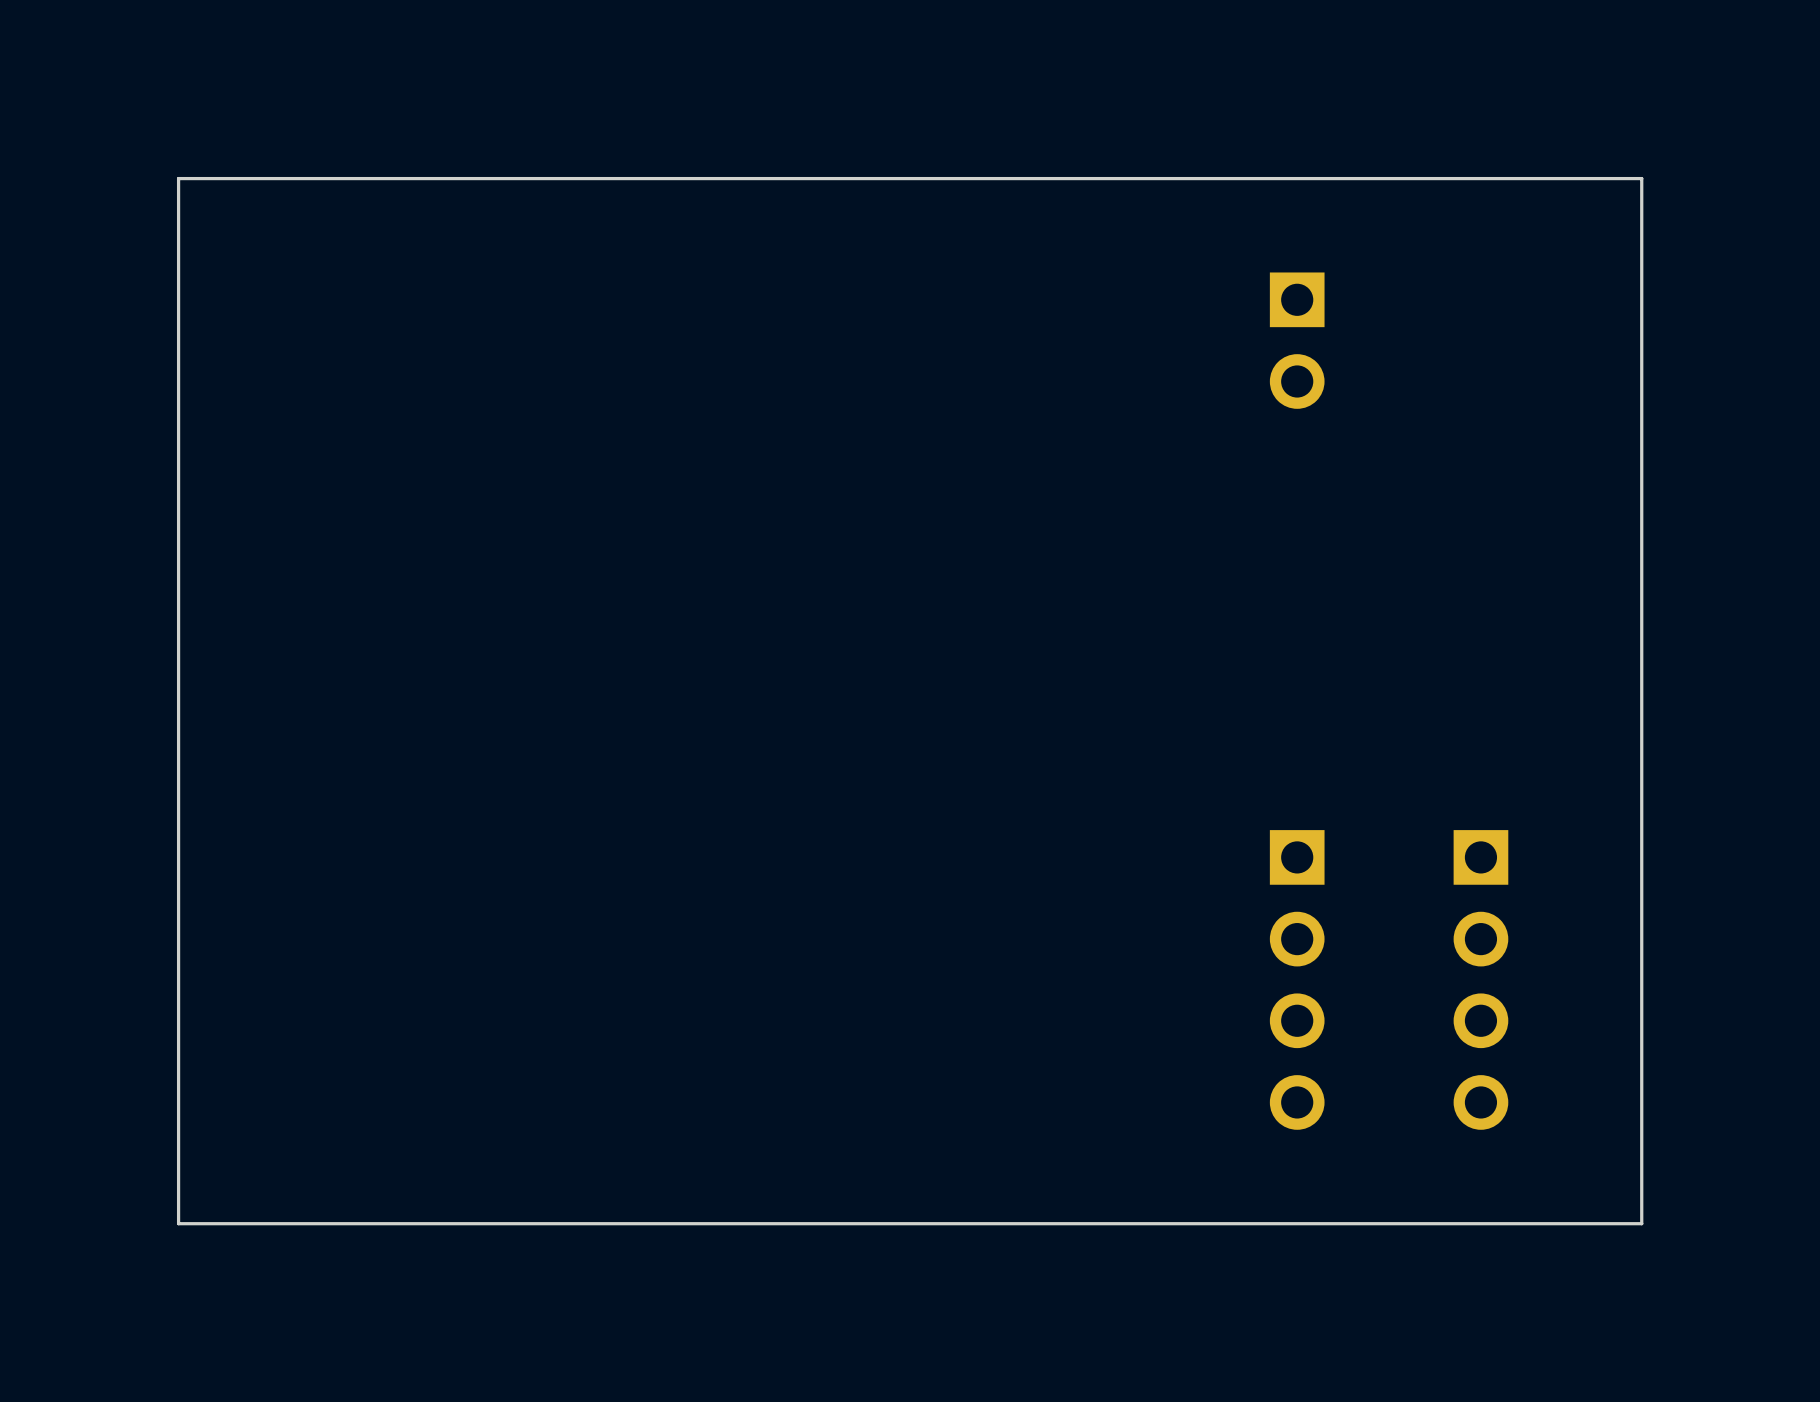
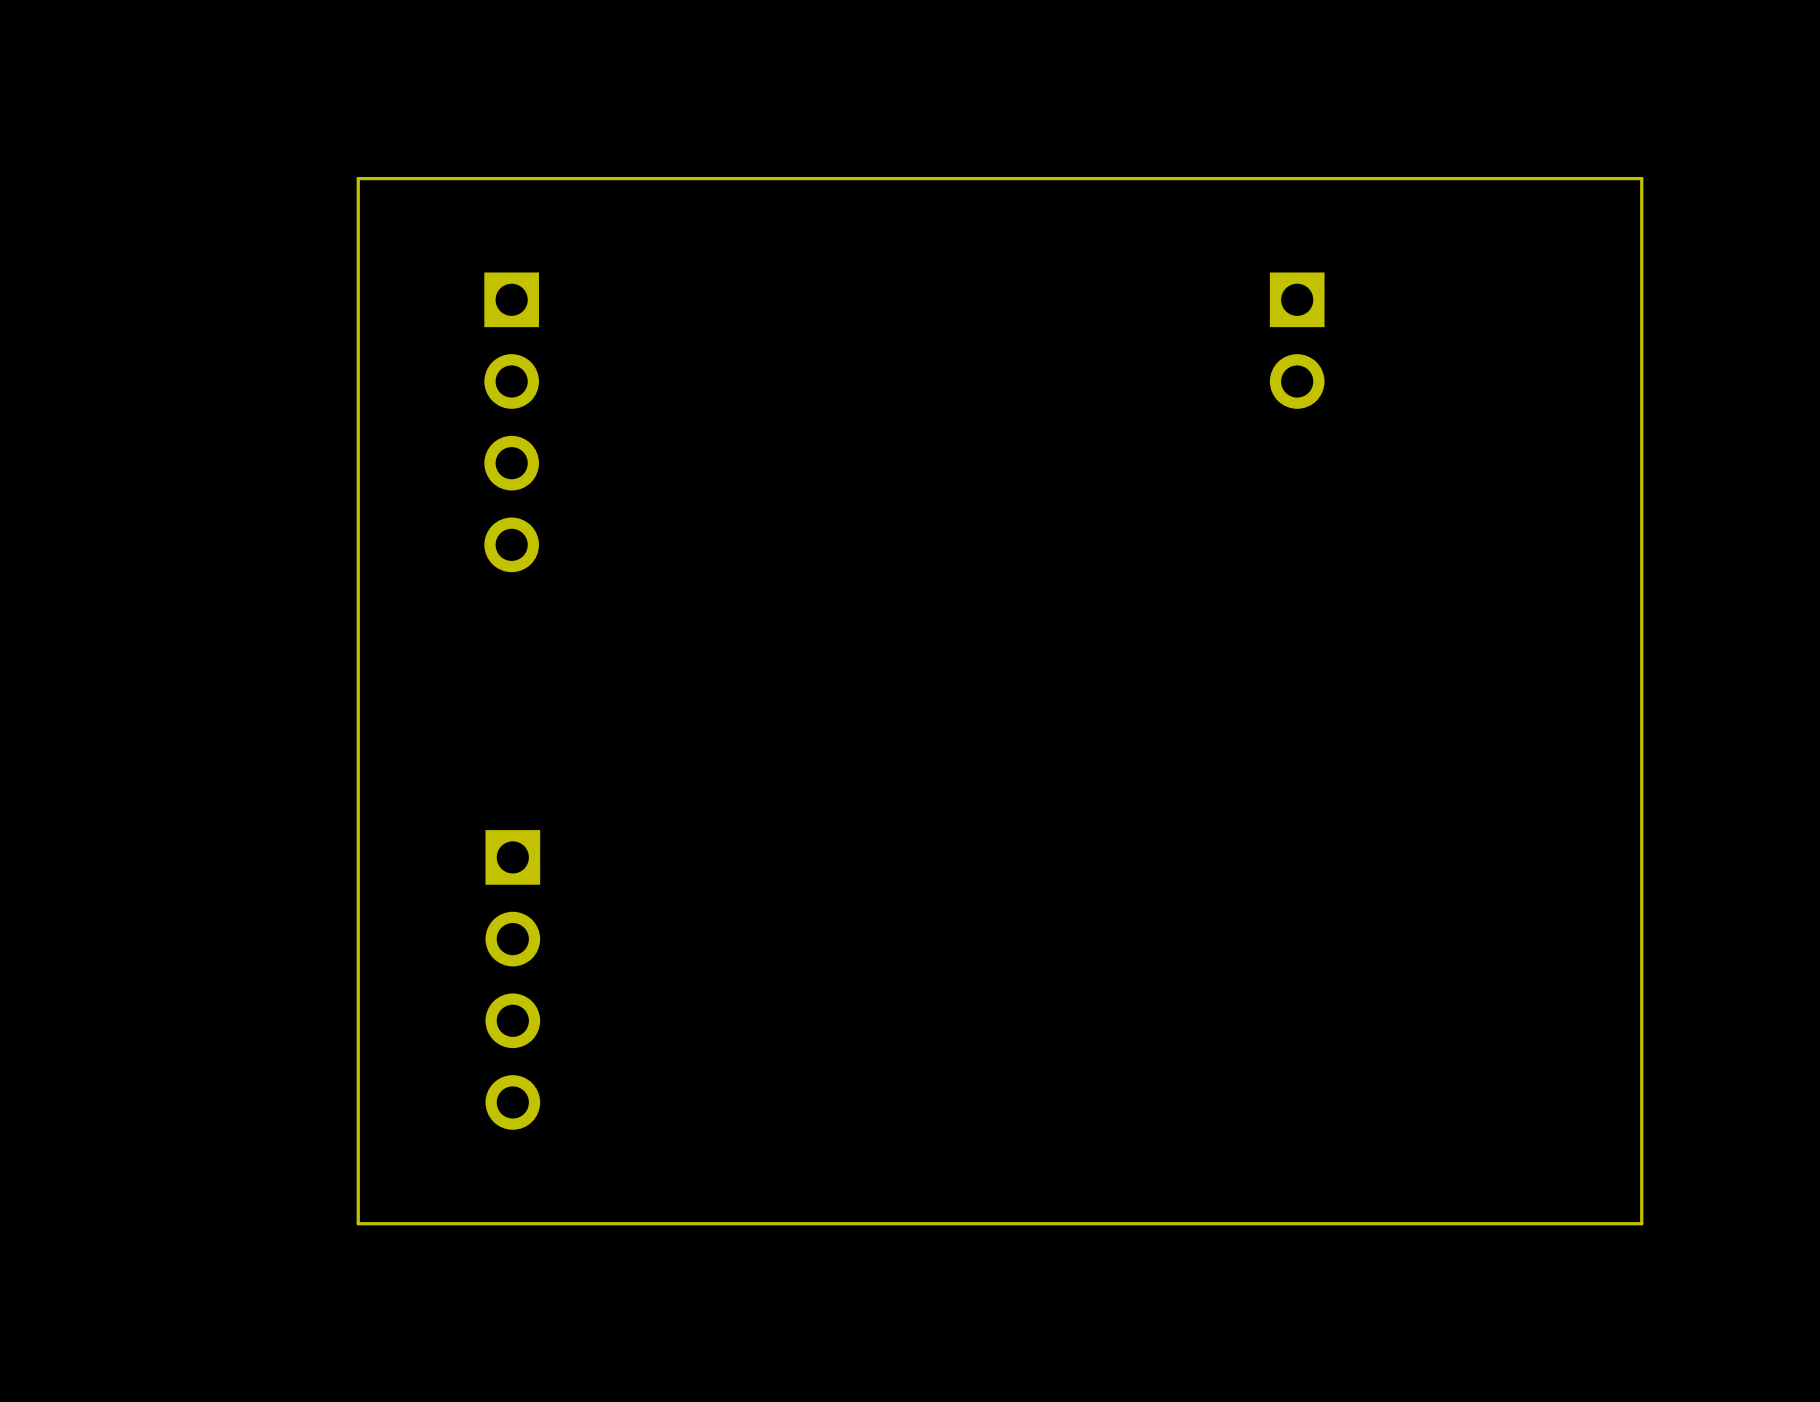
board edge: (358, 178) (178, 178) (178, 1223) (358, 1223) -> (358, 178) (358, 1223)
part: none -> (511, 422)
part: none -> (512, 979)
part: (1297, 979) -> none
part: (1480, 979) -> none

